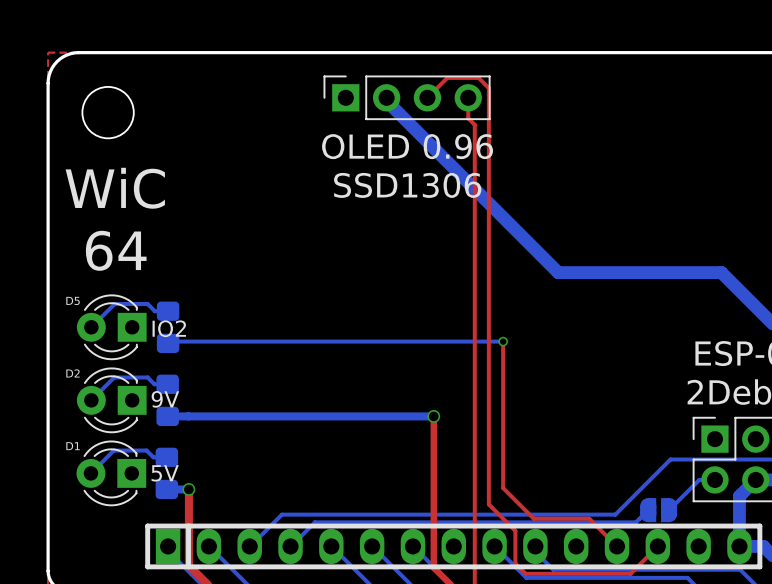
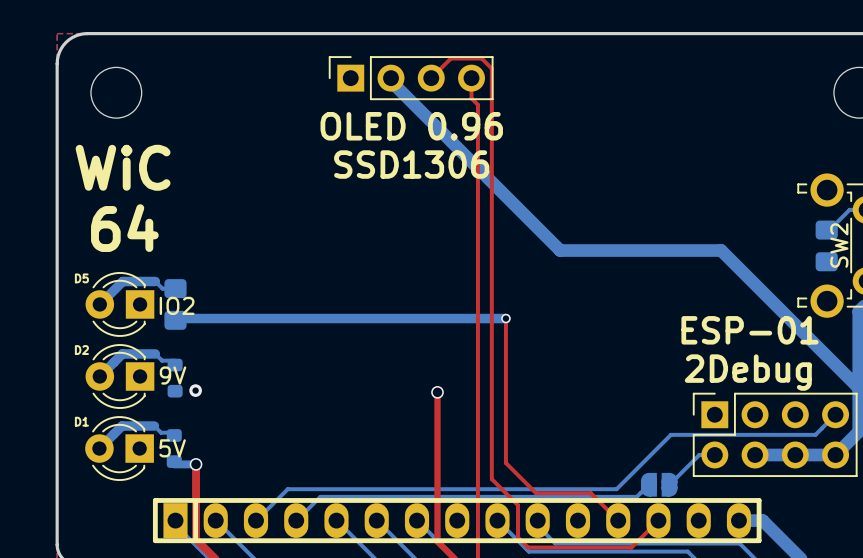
bottom track width: thin (147, 304) (114, 304) (91, 327) -> thick (155, 281) (122, 281) (99, 304)
bottom track width: thin (168, 341) (503, 341) -> thick (175, 318) (505, 318)
part footprint: [156, 374, 179, 427] -> [167, 358, 183, 398]
bottom track width: thin (147, 377) (114, 377) (91, 400) -> thick (155, 353) (122, 353) (99, 376)
via: none -> (195, 390)
bottom track: (167, 416) (433, 416) -> none
part footprint: [155, 447, 179, 500] -> [166, 429, 182, 468]
bottom track width: thin (146, 450) (113, 450) (90, 473) -> thick (154, 426) (121, 426) (99, 448)
bottom track: (755, 479) (739, 496) (739, 546) -> none

